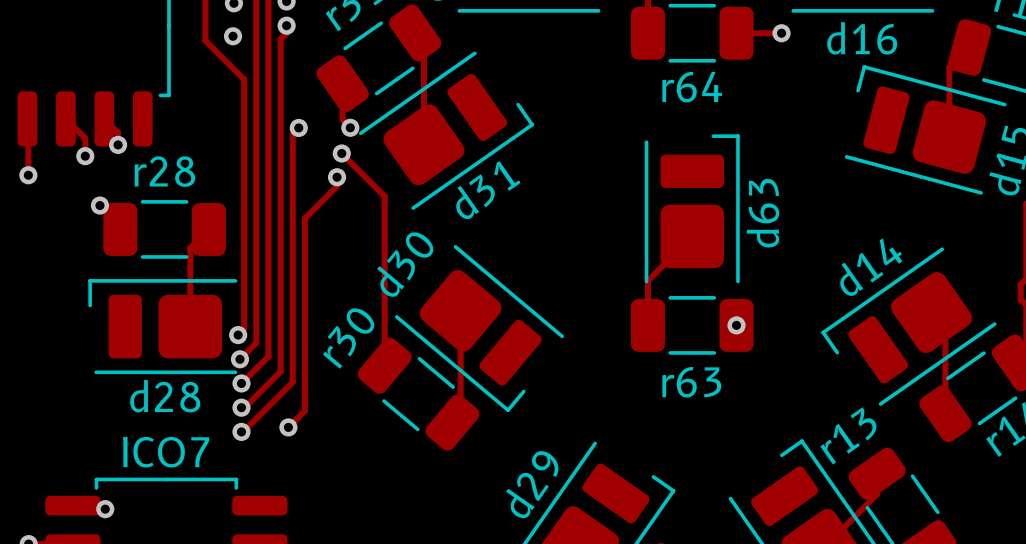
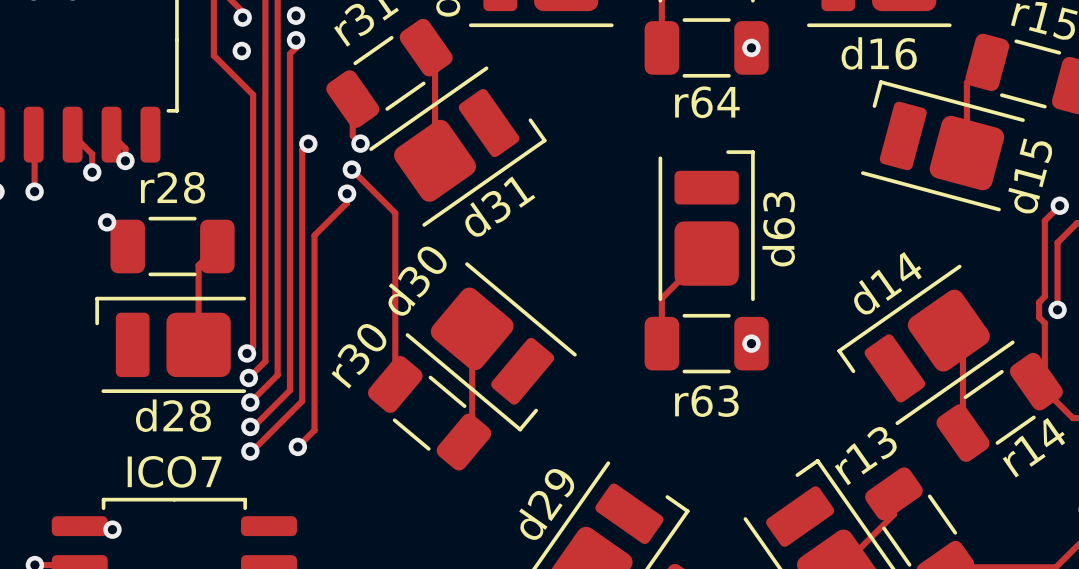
track: (736, 33) (781, 33) -> none
via position: (781, 33) -> (751, 47)

